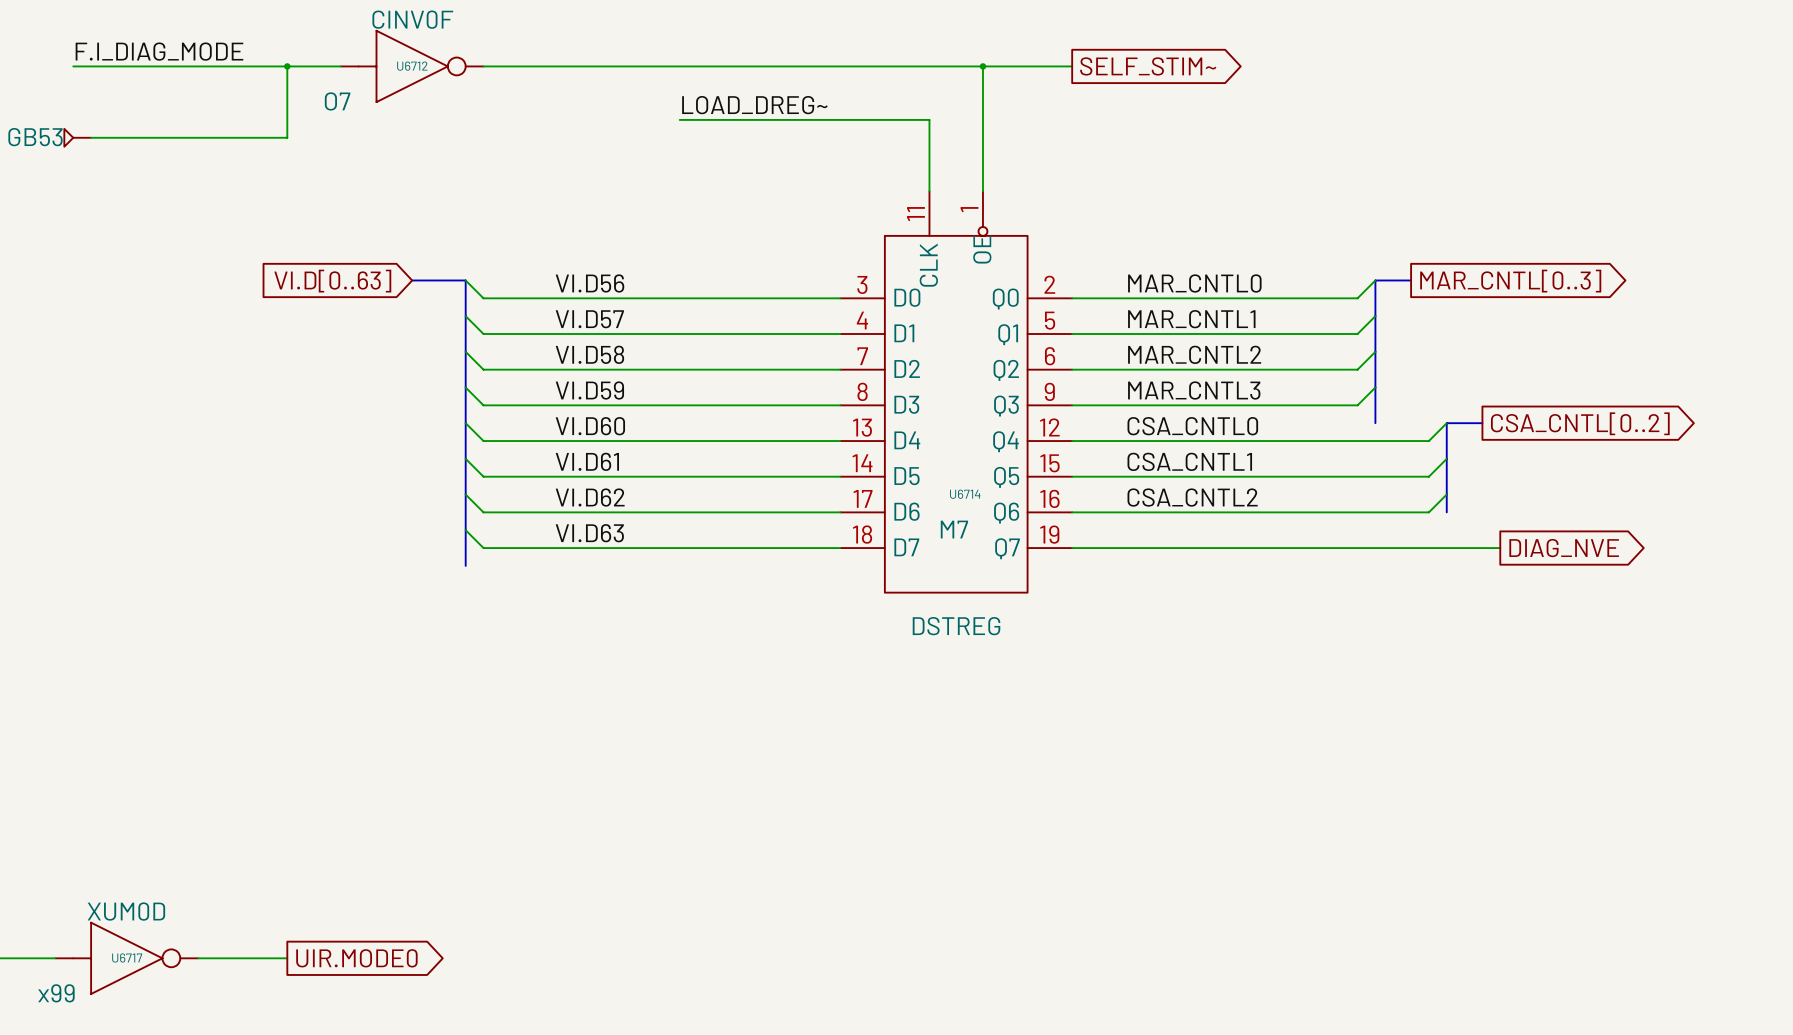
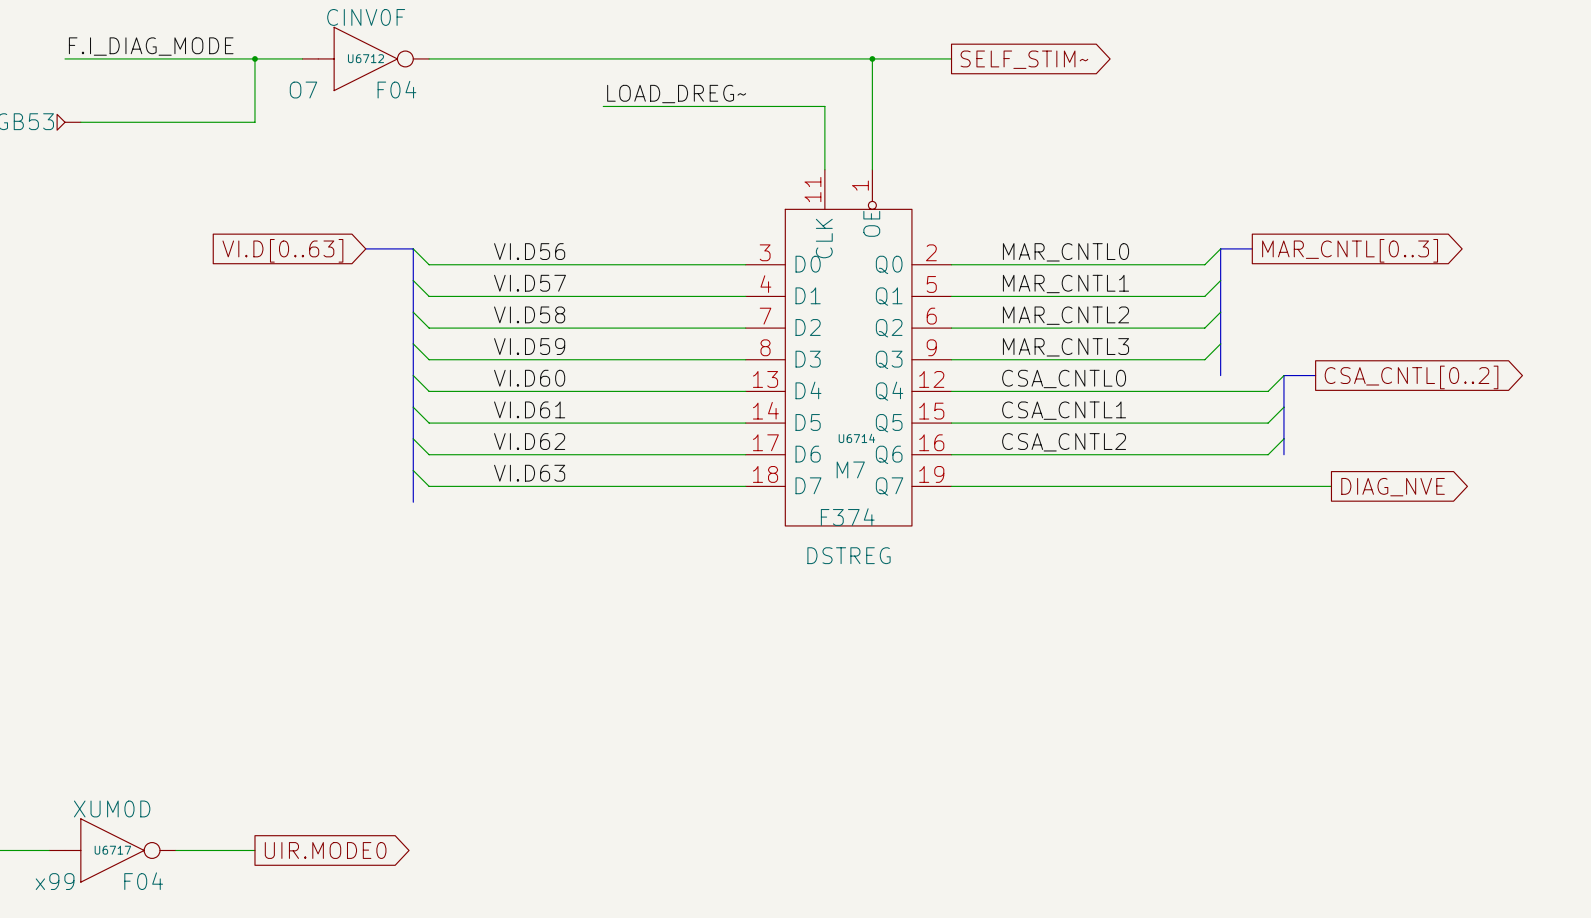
U6712 value: none -> F04 (396, 89)
U6714 value: none -> F374 (847, 517)
U6717 value: none -> F04 (143, 881)

